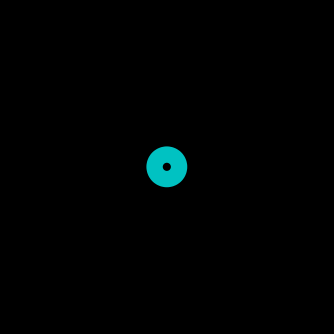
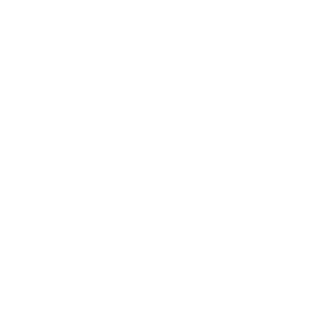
part: (166, 166) -> none

